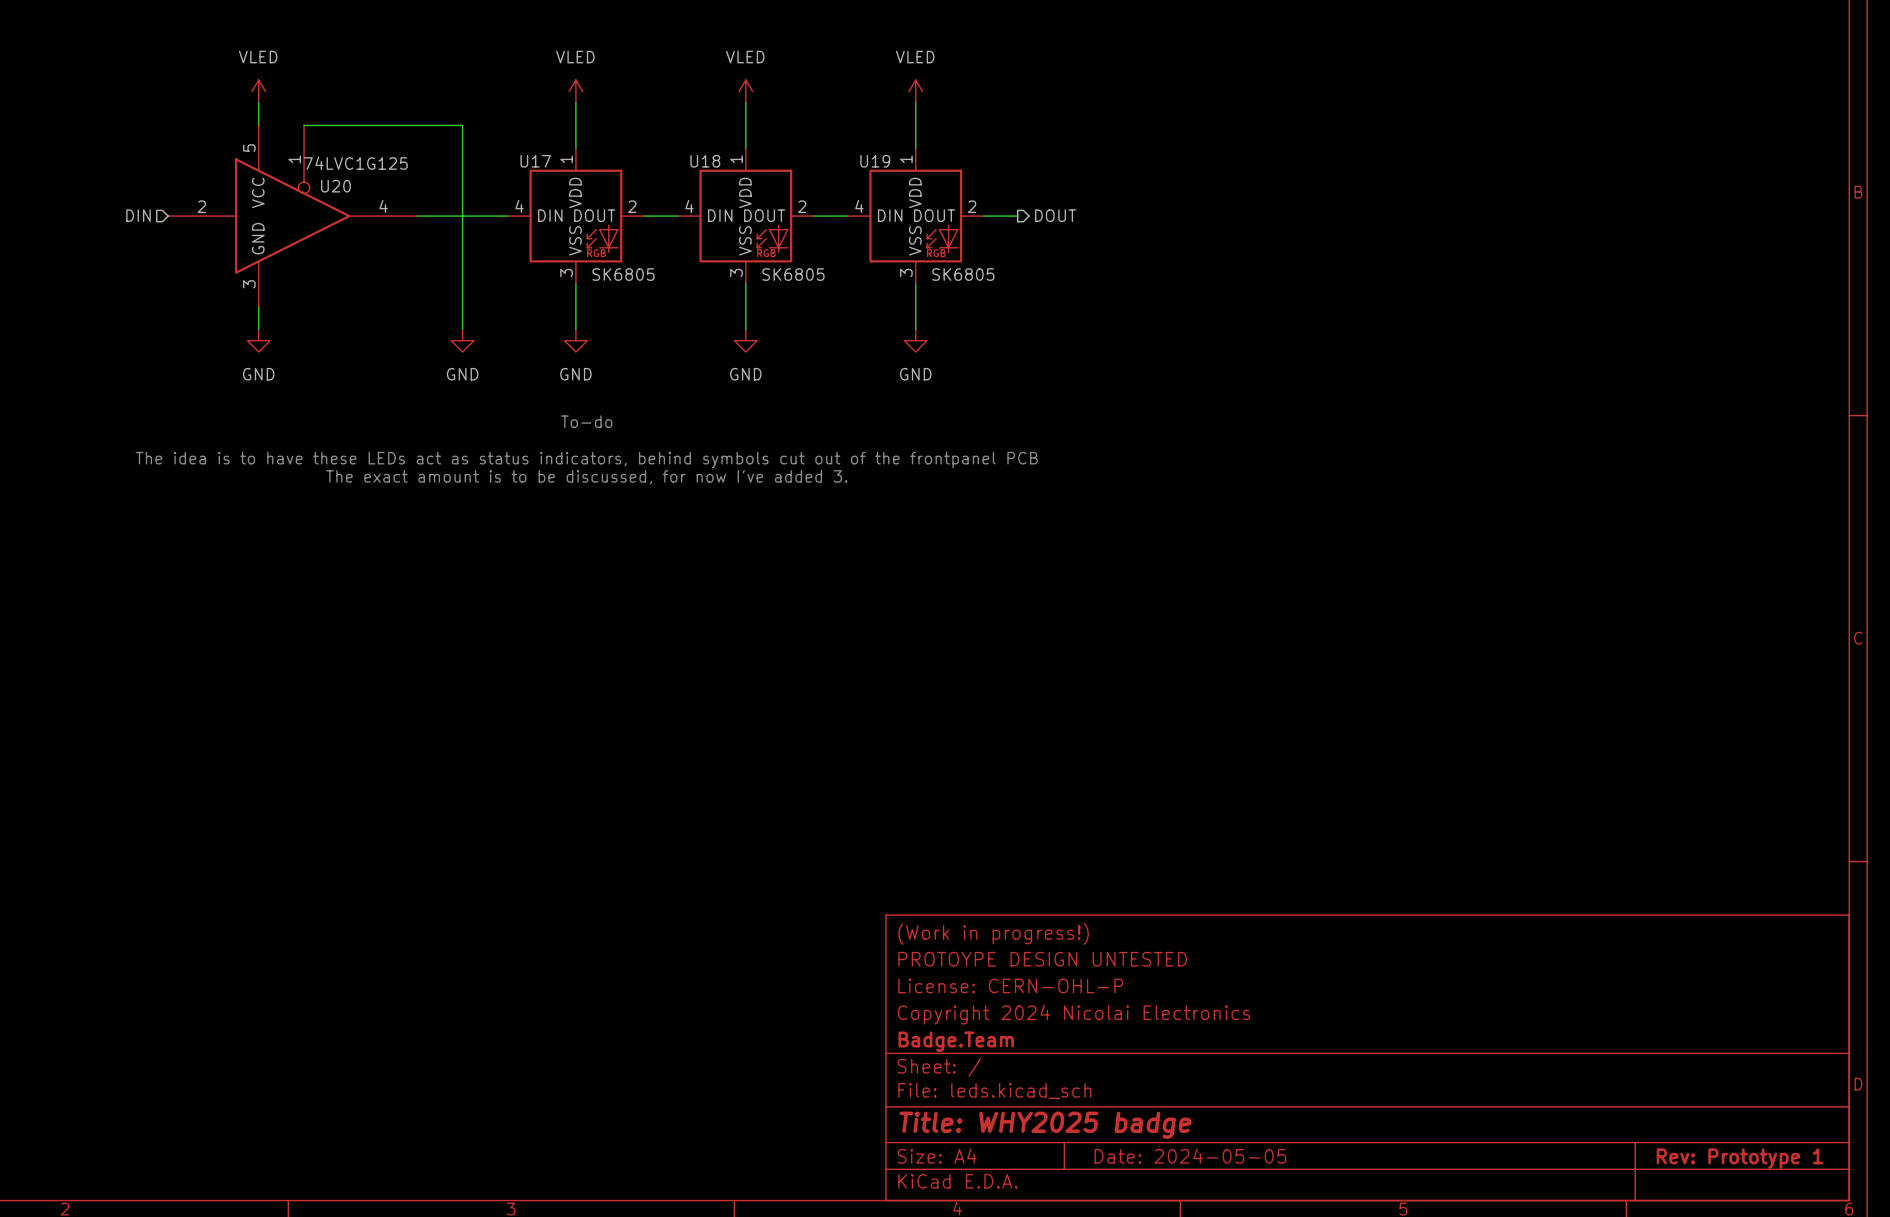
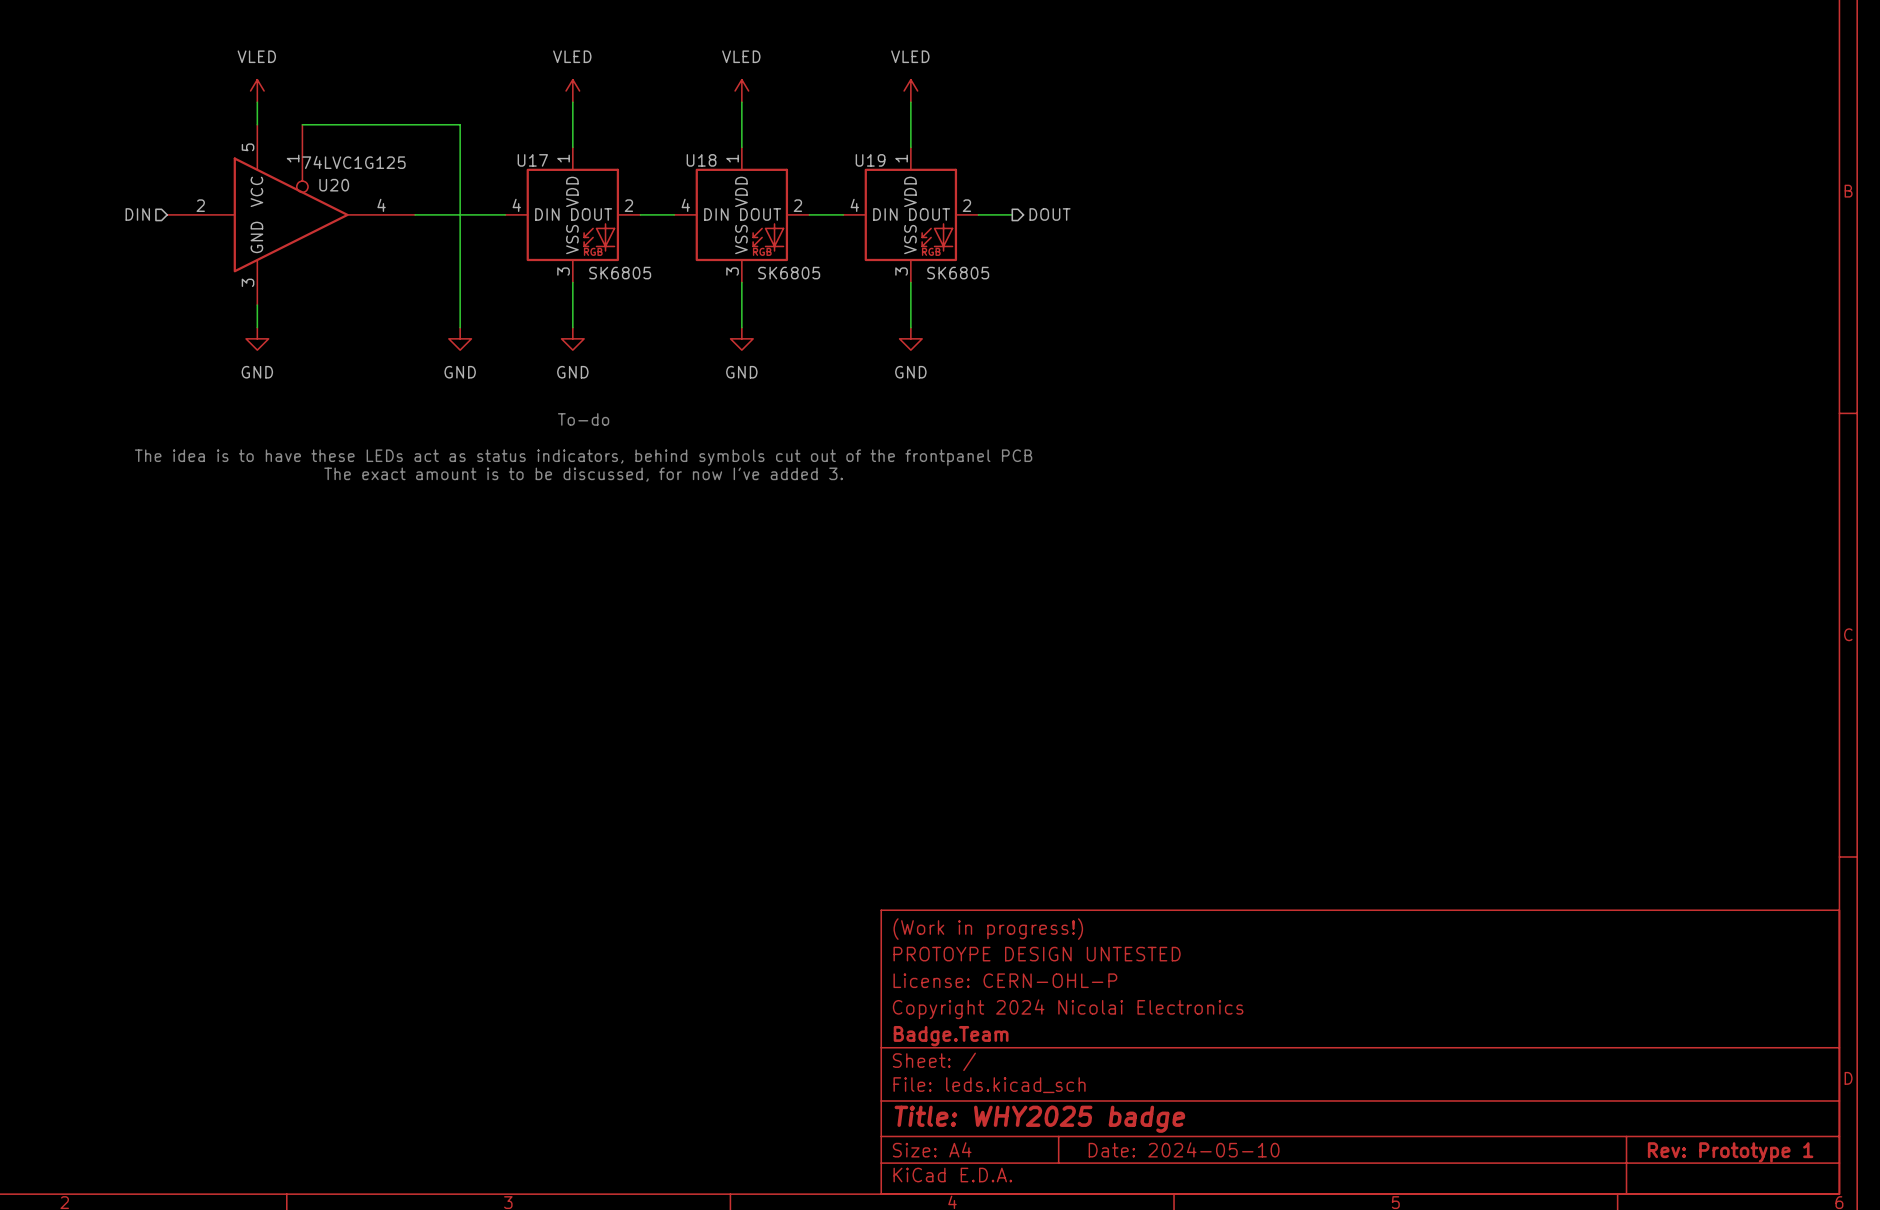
title block: Date: 2024-05-05 (1190, 1156) -> Date: 2024-05-10 (1184, 1149)

